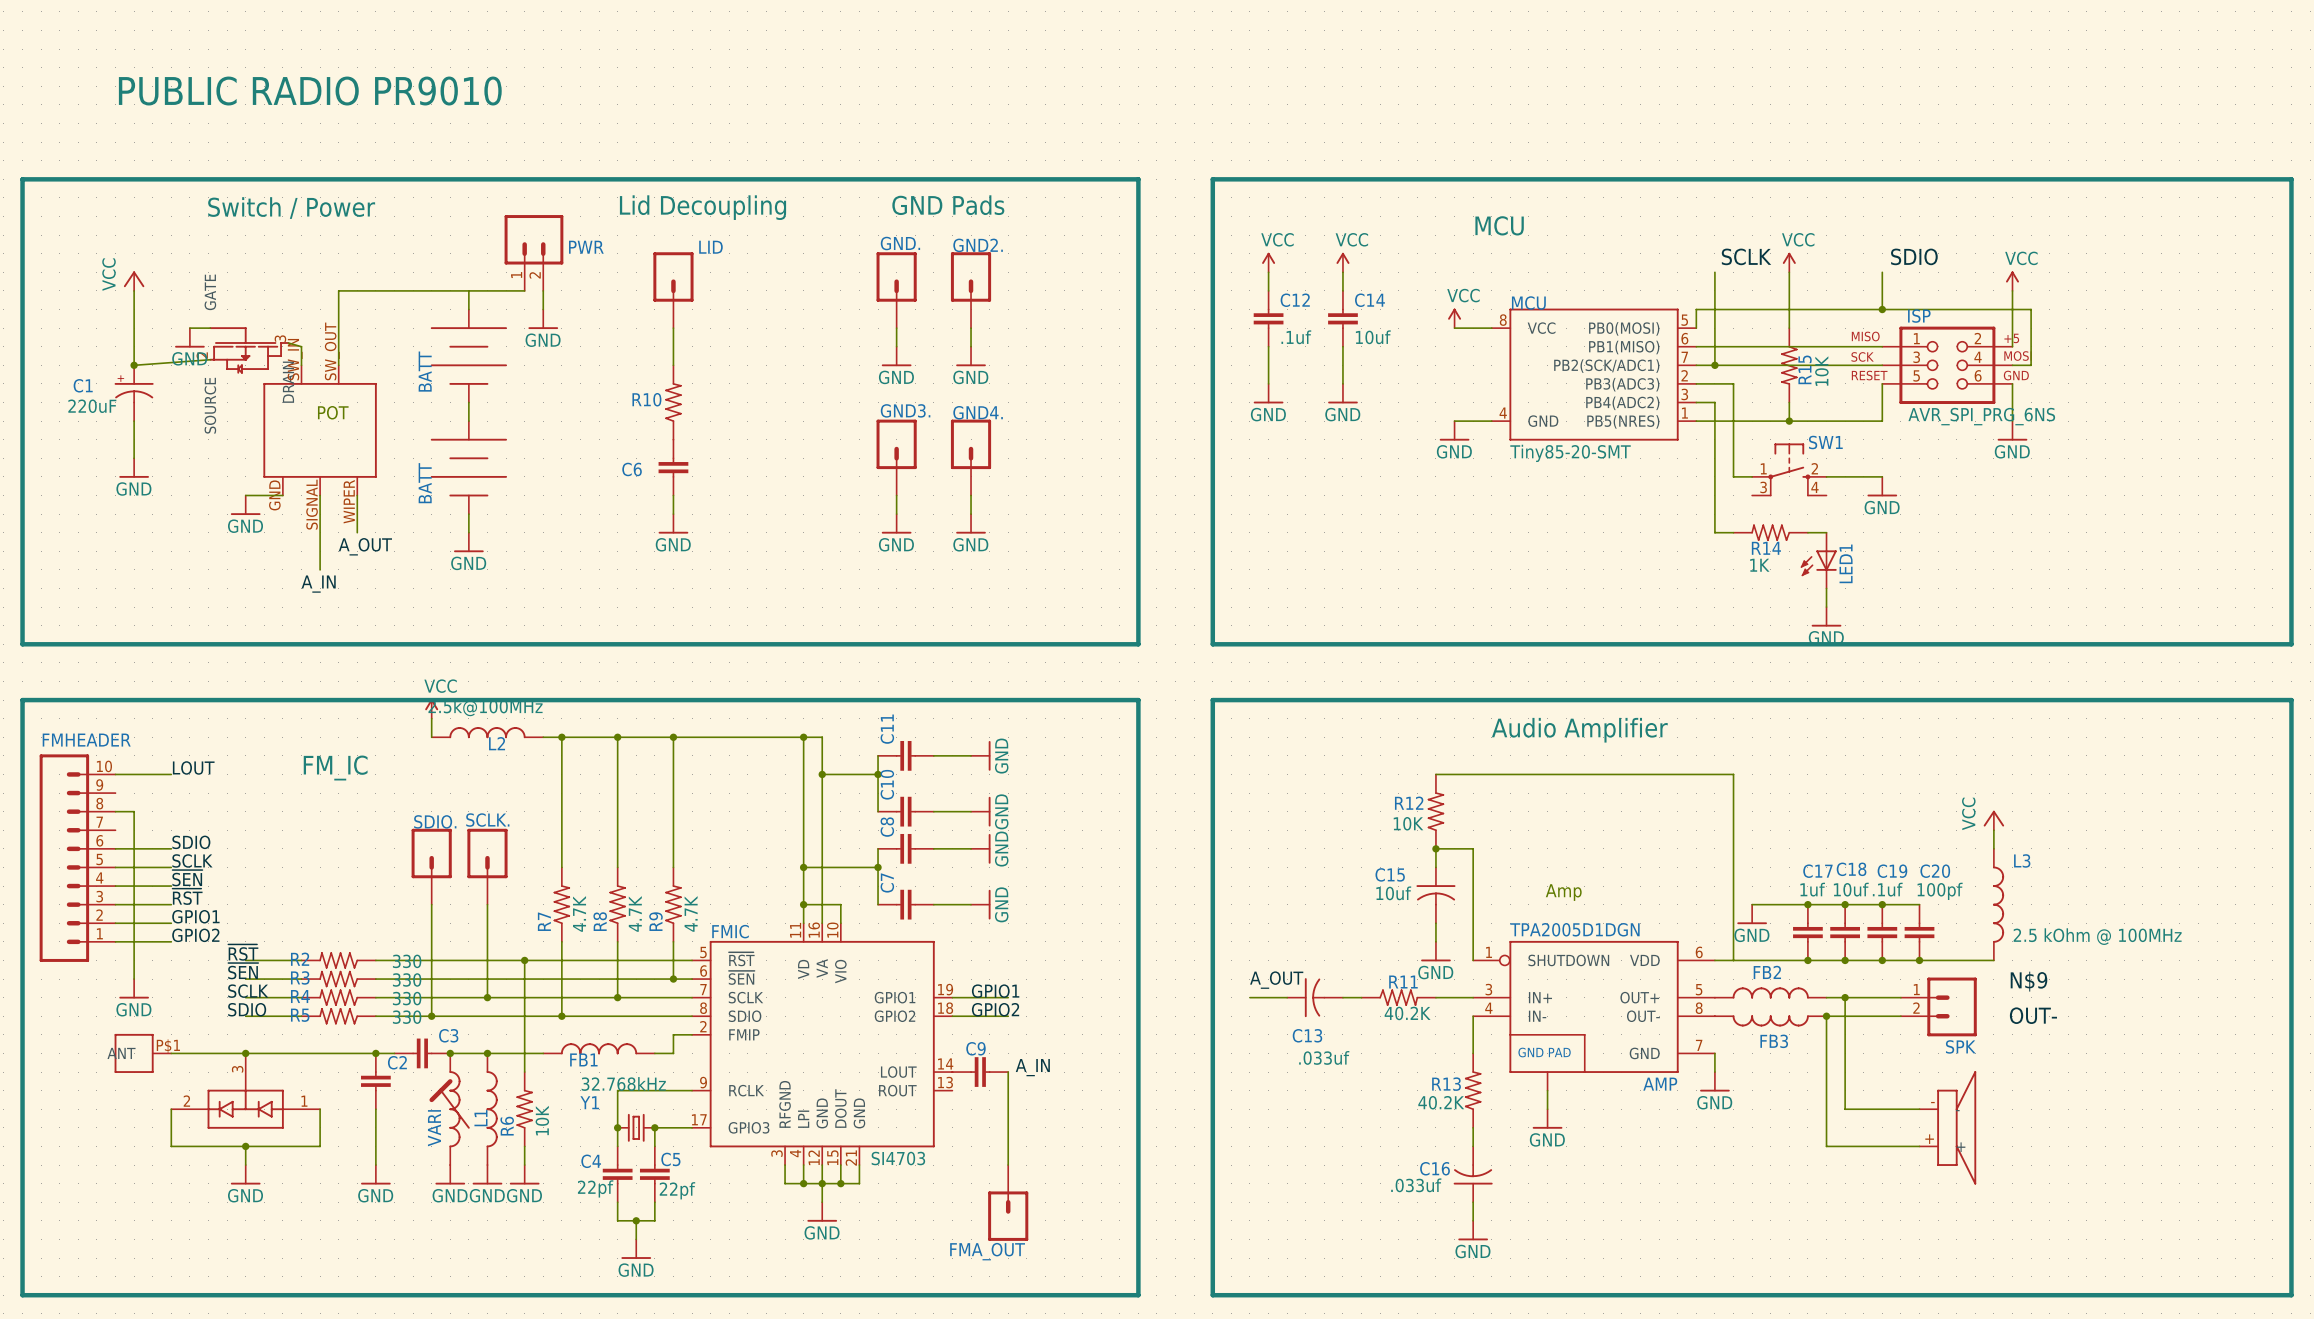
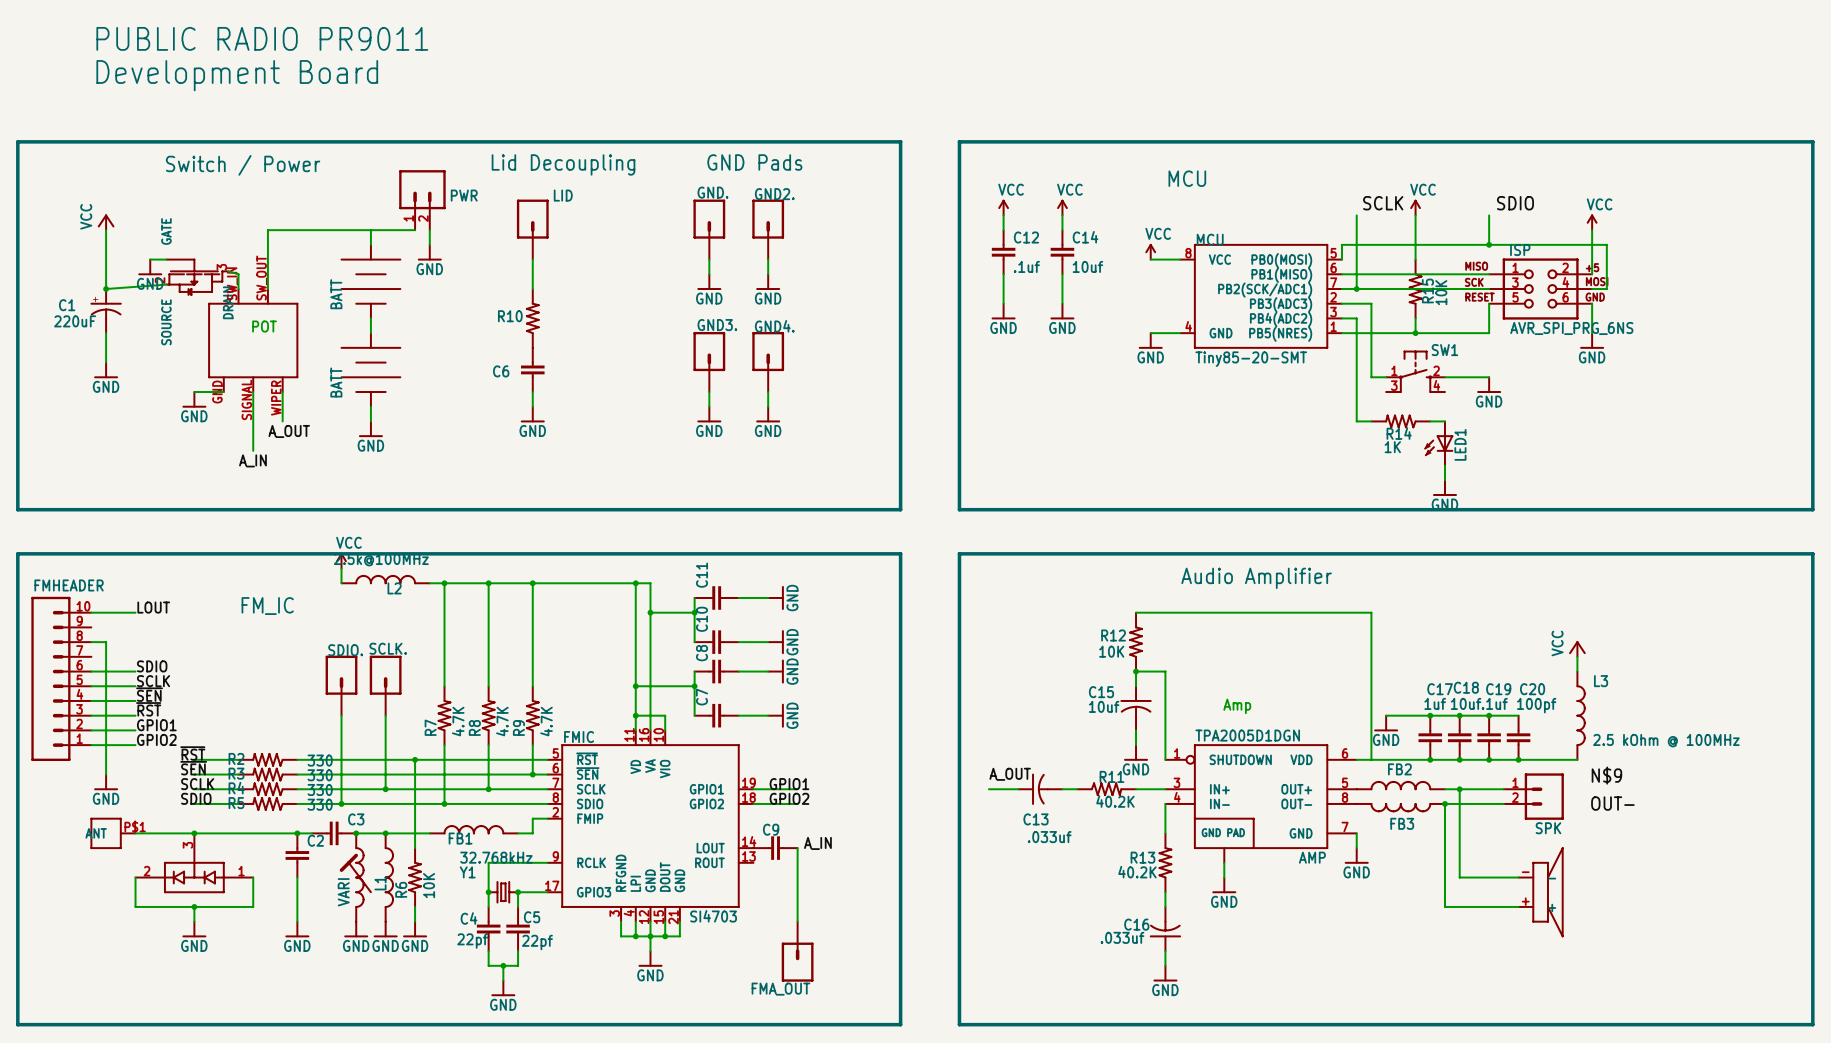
text: none -> PUBLIC RADIO PR9011 (262, 38)
text: PUBLIC RADIO PR9010 (310, 91) -> Development Board (237, 75)

